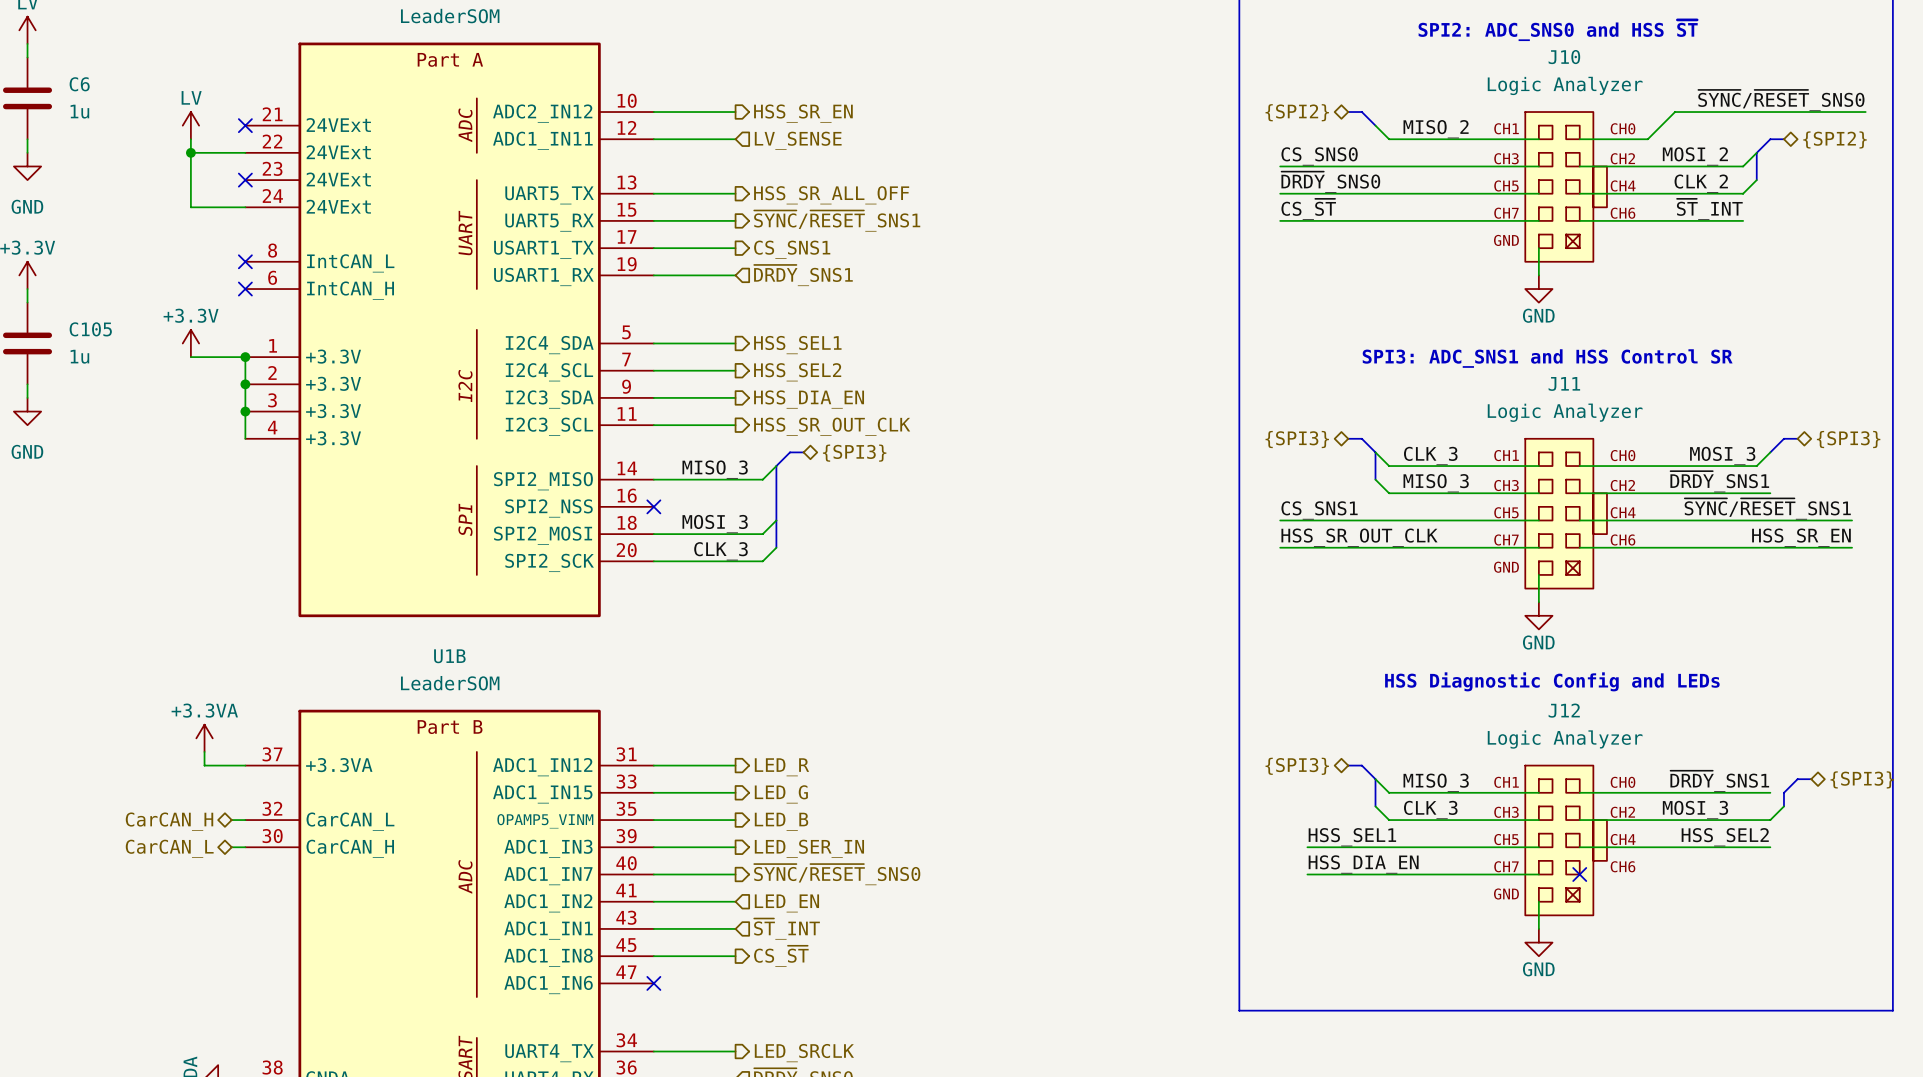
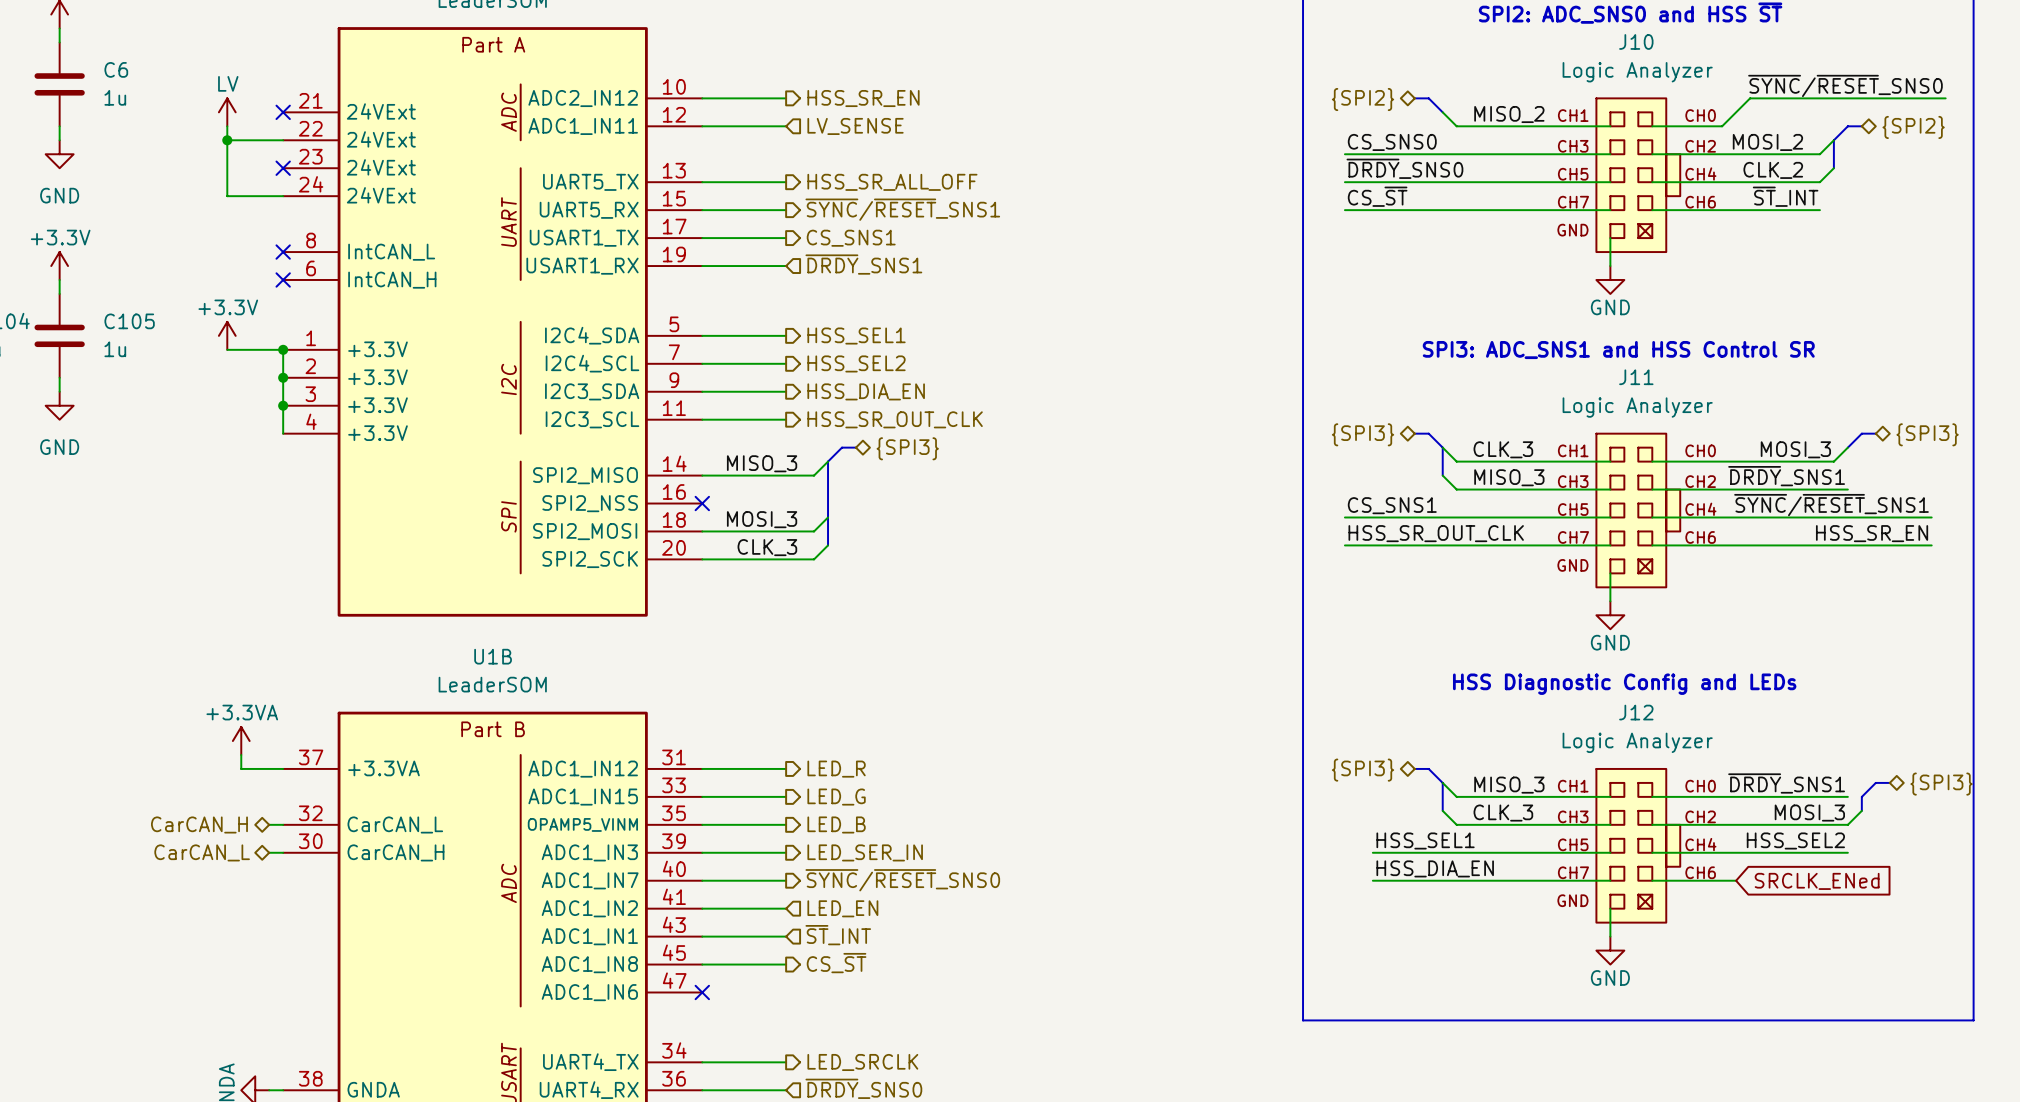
label position: MOSI_3 (1695, 809) -> MOSI_3 (1809, 813)
wire: none -> (1652, 880) (1736, 880)
no-connect mark: (1579, 874) -> none
global label: none -> SRCLK_ENed (1817, 881)

